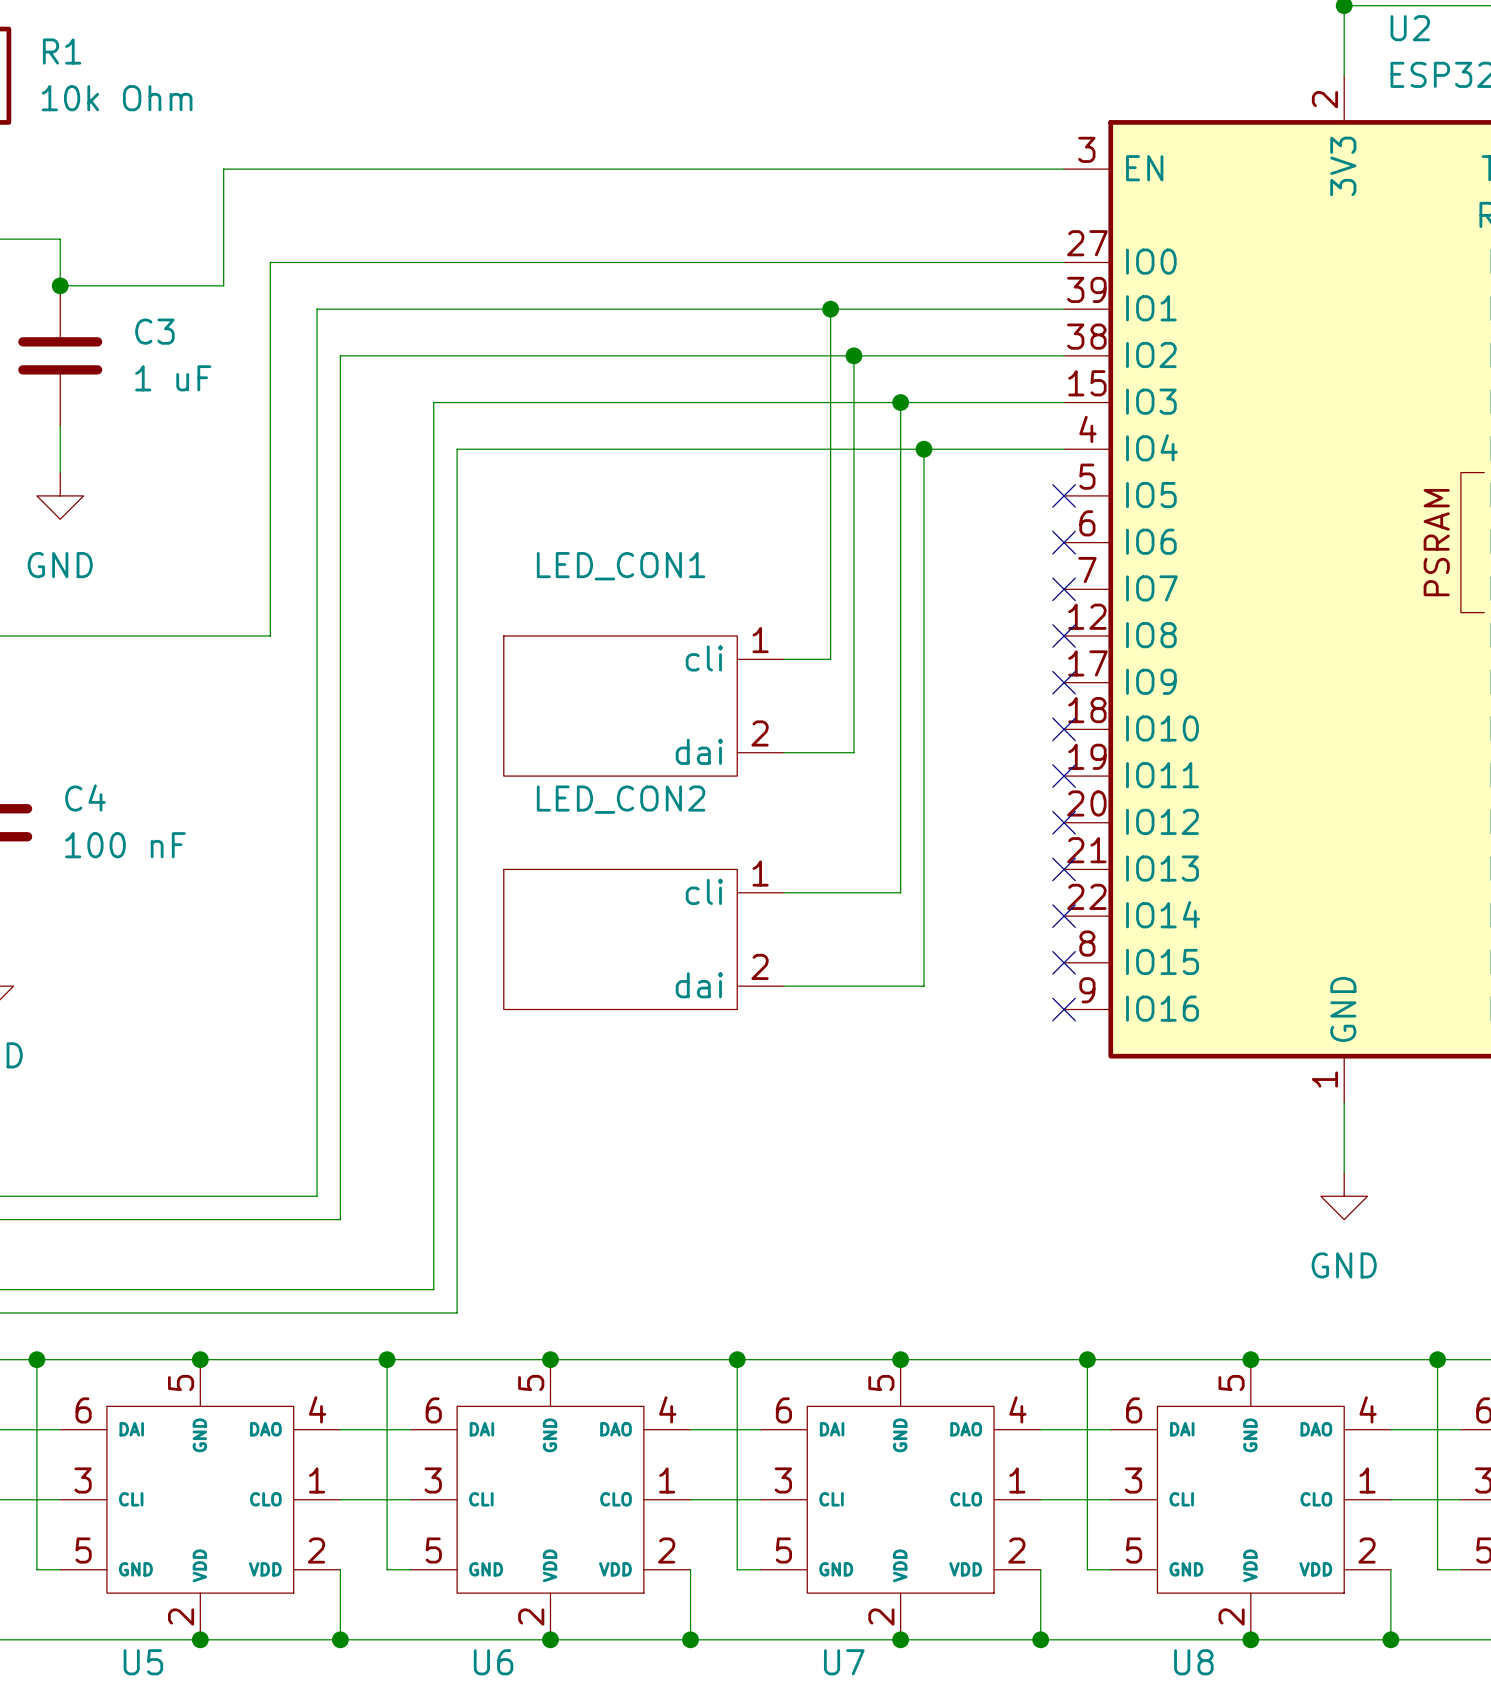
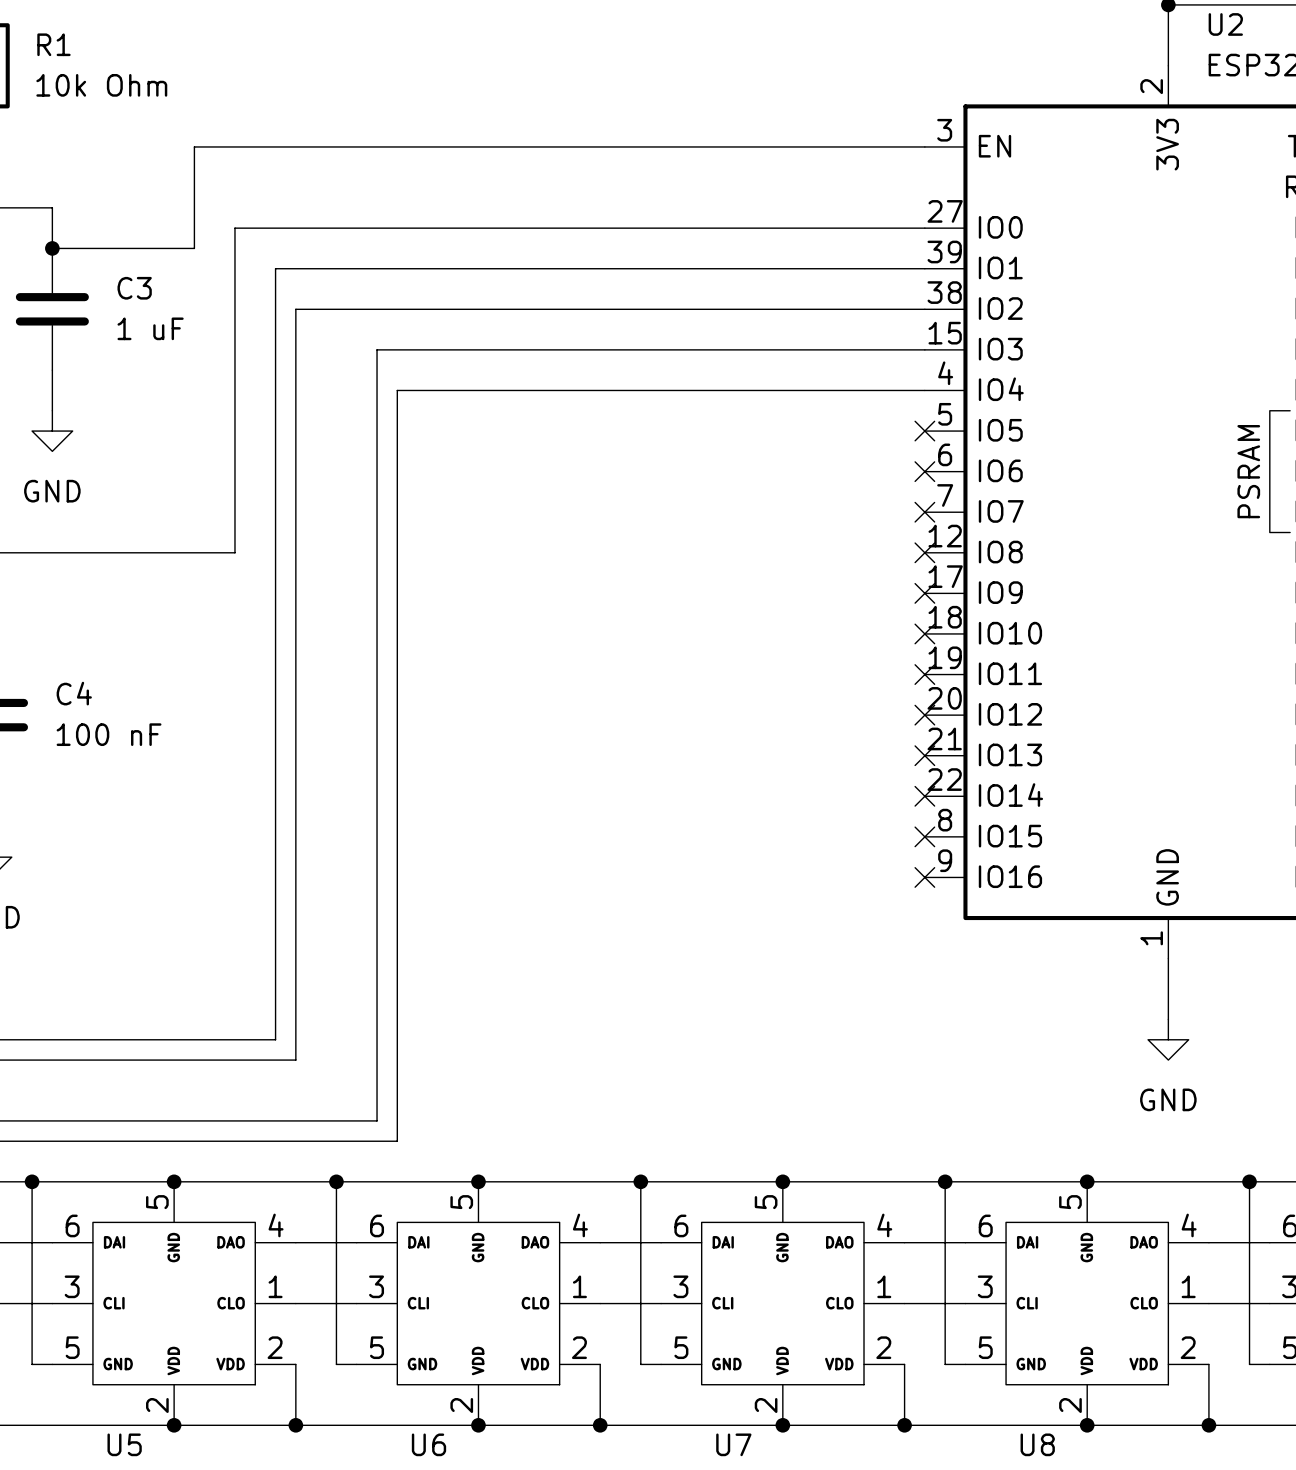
wire: (830, 309) (830, 659) (783, 659) -> none
junction: (830, 309) -> none
wire: (853, 355) (853, 752) (783, 752) -> none
junction: (853, 355) -> none
wire: (900, 402) (900, 892) (783, 892) -> none
junction: (900, 402) -> none
wire: (923, 449) (923, 986) (783, 986) -> none
junction: (923, 449) -> none
LED_CON1: (643, 706) -> none
LED_CON2: (643, 939) -> none

